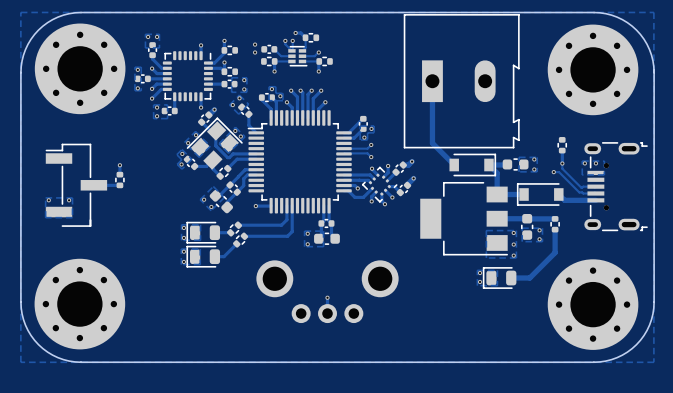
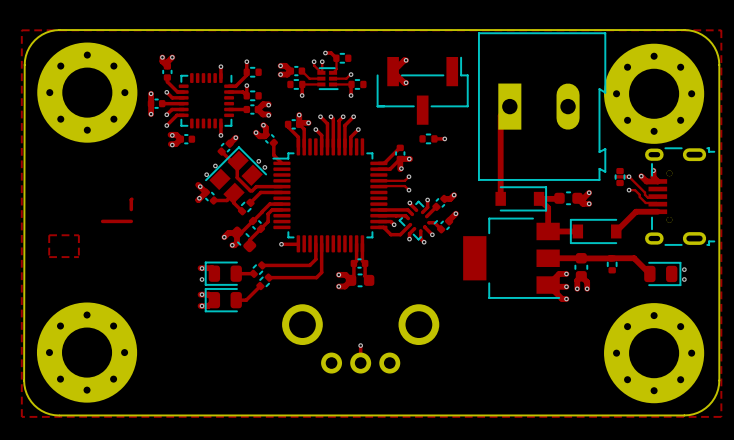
zone outline: (145, 34) (145, 48) (159, 48) (159, 34) (145, 34) -> none
track: none -> (162, 57) (162, 61) (167, 66) (167, 62) (172, 57)
track: none -> (406, 60) (393, 71) (406, 82)
via: none -> (406, 60)
track: none -> (280, 65) (285, 65) (290, 71) (287, 74) (280, 74)
via: none -> (406, 82)
zone outline: (134, 67) (134, 90) (141, 90) (141, 67) (134, 67) -> none
part: none -> (422, 90)
track: none -> (151, 93) (151, 103)
board edge: (654, 70) (652, 313) (643, 335) (632, 348) (617, 357) (594, 362) -> none
board edge: (654, 72) (649, 49) (636, 30) (617, 17) (594, 12) (75, 12) (58, 17) (38, 30) (28, 44) (22, 60) (21, 308) (25, 325) (31, 335) (42, 348) (52, 355) (63, 359) (80, 362) (593, 362) -> none
zone outline: (231, 77) (231, 92) (246, 92) (246, 77) (231, 77) -> none
track: none -> (151, 103) (151, 114)
track: none -> (268, 104) (263, 104) (257, 109) (262, 114) (268, 114)
track: (432, 81) (432, 143) (454, 164) -> (509, 106) (500, 115) (500, 198)
part position: (461, 81) -> (542, 106)
zone outline: (269, 86) (269, 100) (282, 100) (282, 93) (275, 93) (275, 86) (269, 86) -> none
track: none -> (299, 115) (299, 124)
zone outline: (239, 95) (229, 104) (238, 114) (248, 104) (239, 95) -> none
track: (174, 96) (174, 110) -> none
track: none -> (308, 122) (299, 124)
track: none -> (263, 125) (265, 127) (265, 134) (259, 136) (256, 132)
zone outline: (153, 104) (153, 118) (167, 118) (167, 104) (153, 104) -> none
track: none -> (170, 134) (176, 134) (180, 139) (175, 144) (170, 144)
part: none -> (428, 138)
track: none -> (434, 138) (444, 139)
via: none -> (444, 138)
zone outline: (360, 126) (360, 139) (367, 139) (367, 132) (374, 132) (374, 126) (360, 126) -> none
zone outline: (235, 127) (219, 143) (228, 153) (245, 136) (235, 127) -> none
track: none -> (400, 159) (400, 169)
track: none -> (400, 158) (410, 158)
zone outline: (195, 131) (184, 142) (199, 157) (210, 146) (195, 131) -> none
track: none -> (653, 170) (653, 177) (657, 181) (646, 181) (641, 176)
via: none -> (653, 170)
track: none -> (629, 176) (647, 197) (657, 196)
via: none -> (629, 176)
via: none -> (641, 176)
track: none -> (615, 176) (628, 176)
zone outline: (182, 149) (176, 154) (181, 159) (177, 164) (182, 169) (191, 159) (182, 149) -> none
track: (562, 150) (562, 168) (581, 187) (594, 187) -> none
track: none -> (198, 184) (205, 192) (198, 200)
zone outline: (519, 157) (519, 171) (537, 171) (537, 157) (519, 157) -> none
track: none -> (629, 190) (635, 190) (645, 203) (657, 204)
via: none -> (629, 190)
track: none -> (589, 192) (583, 198) (577, 198) (583, 203) (589, 203)
zone outline: (582, 161) (582, 175) (604, 175) (604, 161) (582, 161) -> none
via: (562, 163) -> none
via: (584, 163) -> none
via: (595, 163) -> none
via: (119, 165) -> none
track: (553, 172) (559, 172) (579, 192) (594, 192) -> none
via: (553, 172) -> none
part: (119, 180) -> none
part: (76, 185) -> none
zone outline: (213, 186) (200, 199) (211, 210) (224, 197) (213, 186) -> none
part position: (616, 186) -> (680, 196)
track: (558, 194) (564, 200) (595, 200) -> (616, 231) (635, 211) (657, 211)
track: none -> (224, 237) (228, 232) (237, 232) (237, 242) (232, 245)
via: (48, 200) -> none
via: (69, 200) -> none
track: none -> (609, 258) (634, 258) (650, 274)
zone outline: (181, 224) (181, 240) (200, 240) (200, 224) (181, 224) -> none
track: none -> (200, 268) (212, 268) (214, 270)
zone outline: (522, 228) (522, 241) (542, 241) (542, 228) (522, 228) -> none
track: (555, 229) (555, 252) (529, 278) (510, 277) -> none
via: none -> (684, 269)
zone outline: (486, 230) (486, 257) (516, 257) (516, 230) (486, 230) -> none
via: (539, 230) -> none
zone outline: (304, 231) (304, 246) (323, 246) (323, 231) (304, 231) -> none
track: none -> (566, 273) (559, 273) (548, 285)
track: none -> (338, 274) (345, 274) (351, 280) (344, 286) (338, 286)
track: none -> (581, 276) (577, 280) (577, 288)
track: none -> (581, 276) (587, 282) (587, 288)
via: none -> (684, 279)
via: (539, 239) -> none
track: none -> (566, 286) (549, 286) (562, 299) (566, 299)
via: none -> (577, 288)
via: none -> (587, 288)
zone outline: (181, 249) (181, 264) (200, 264) (200, 249) (181, 249) -> none
track: none -> (200, 294) (208, 294) (214, 300) (208, 305) (200, 305)
zone outline: (477, 270) (477, 285) (497, 285) (497, 270) (477, 270) -> none
via: (480, 273) -> none
part rotation: 0° (499, 278) -> 180° (662, 273)
part position: (499, 278) -> (662, 273)
via: (480, 281) -> none
board edge: none -> (59, 415) (45, 412) (34, 405) (26, 393) (24, 380) (24, 64) (29, 47) (42, 34) (59, 30) (684, 30) (701, 34) (714, 47) (719, 64) (719, 380) (714, 397) (701, 410) (684, 415) (59, 415)

